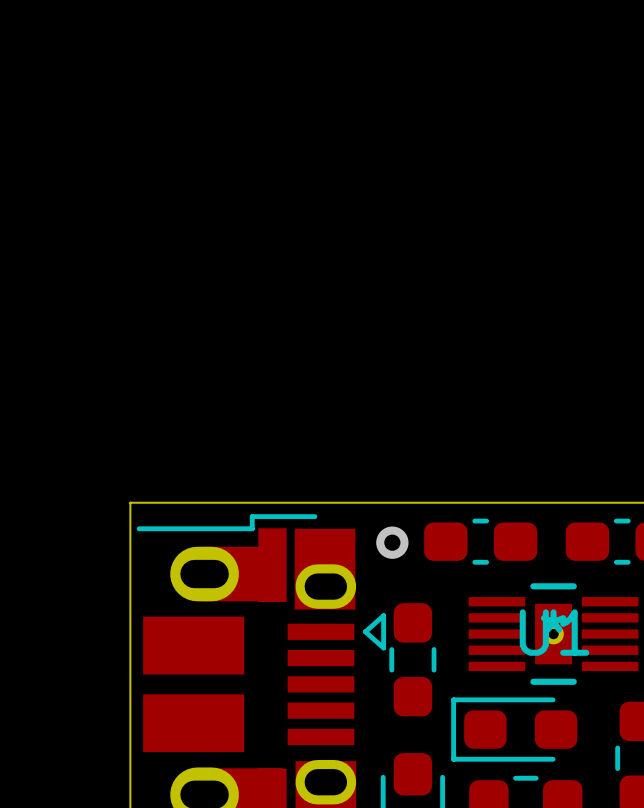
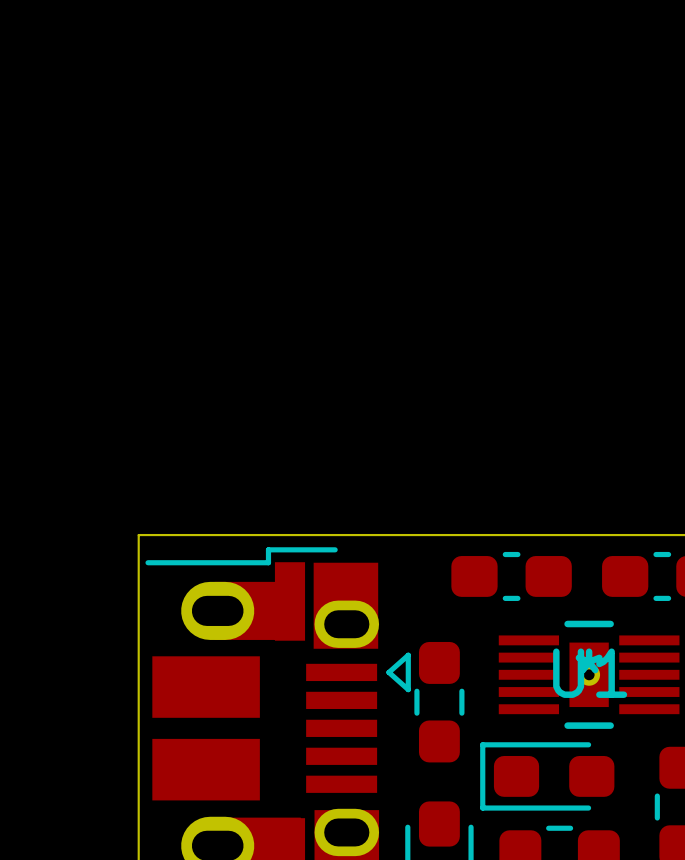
via: (392, 542) -> none

